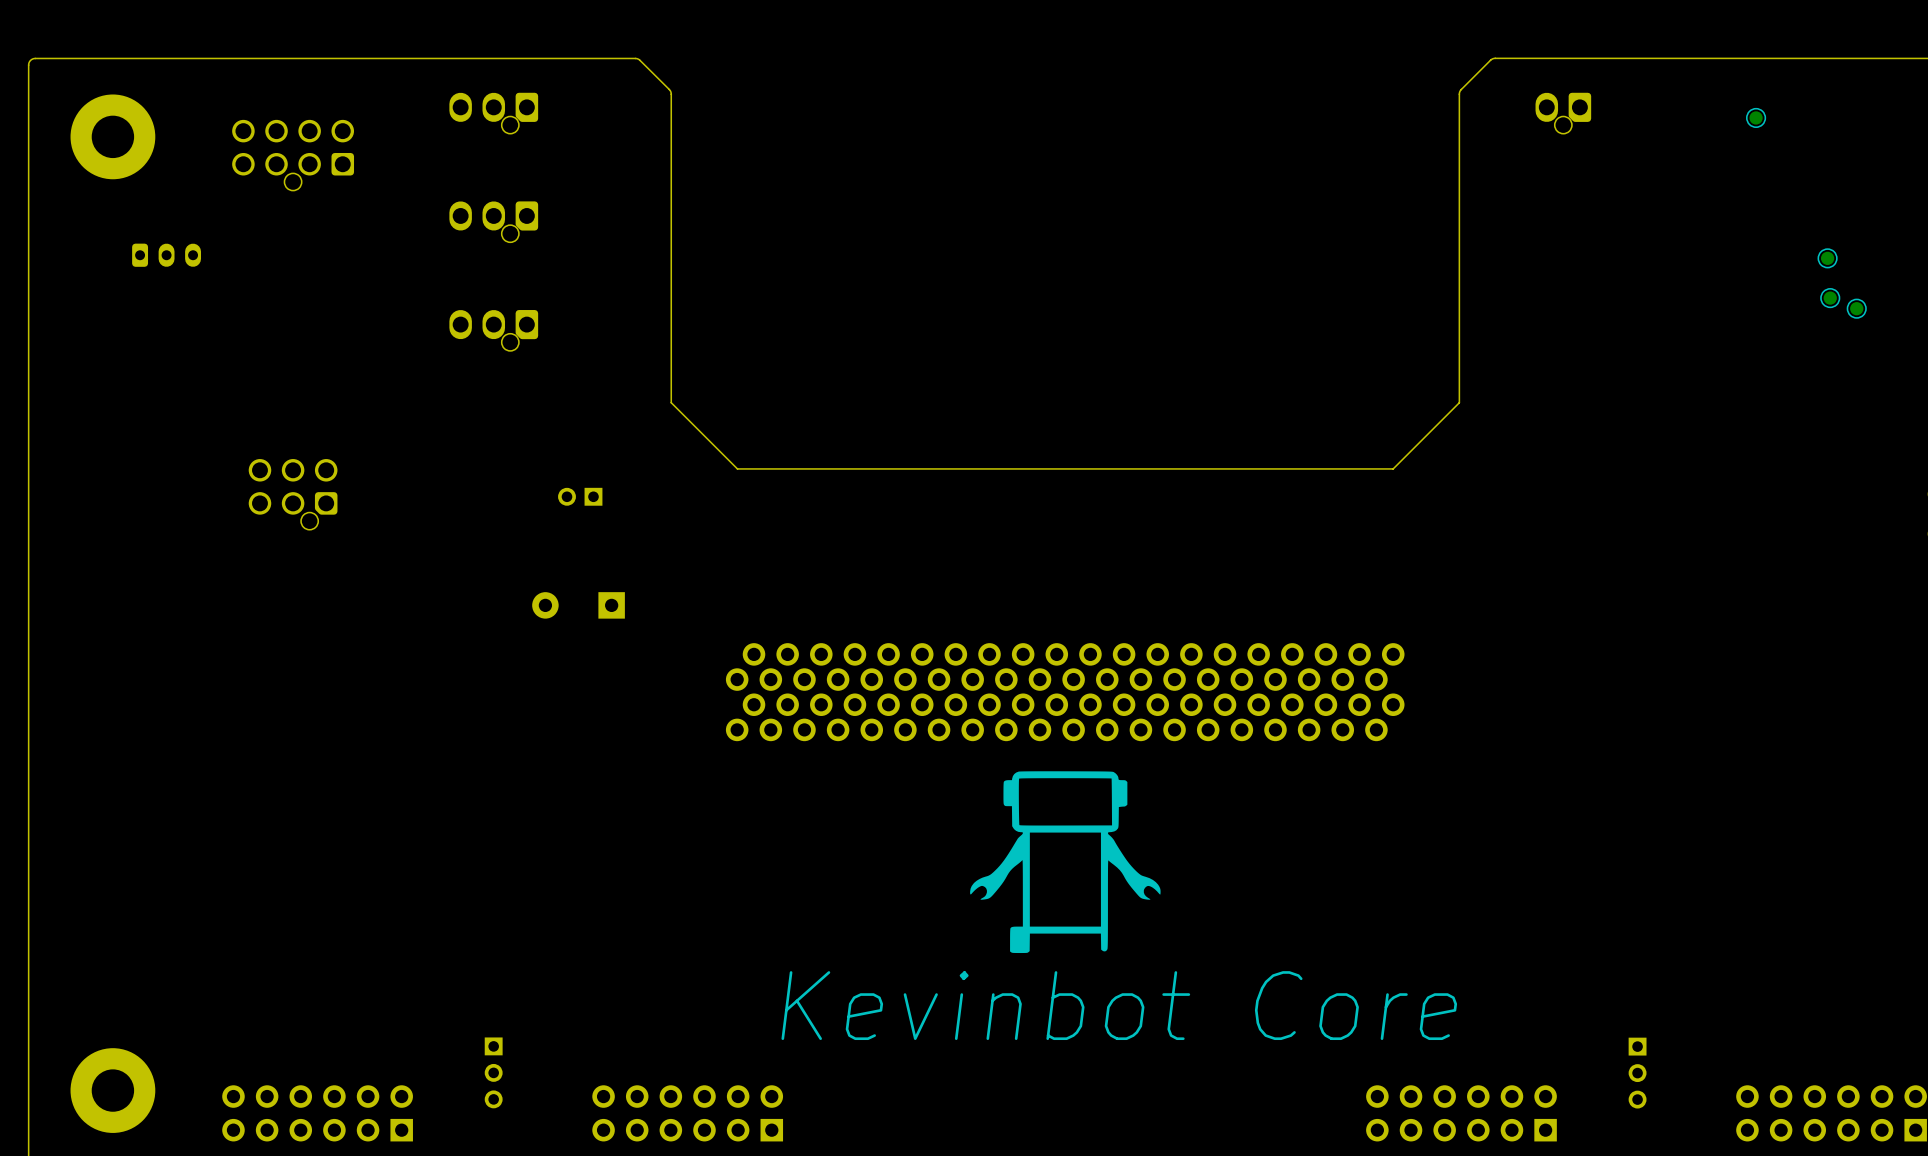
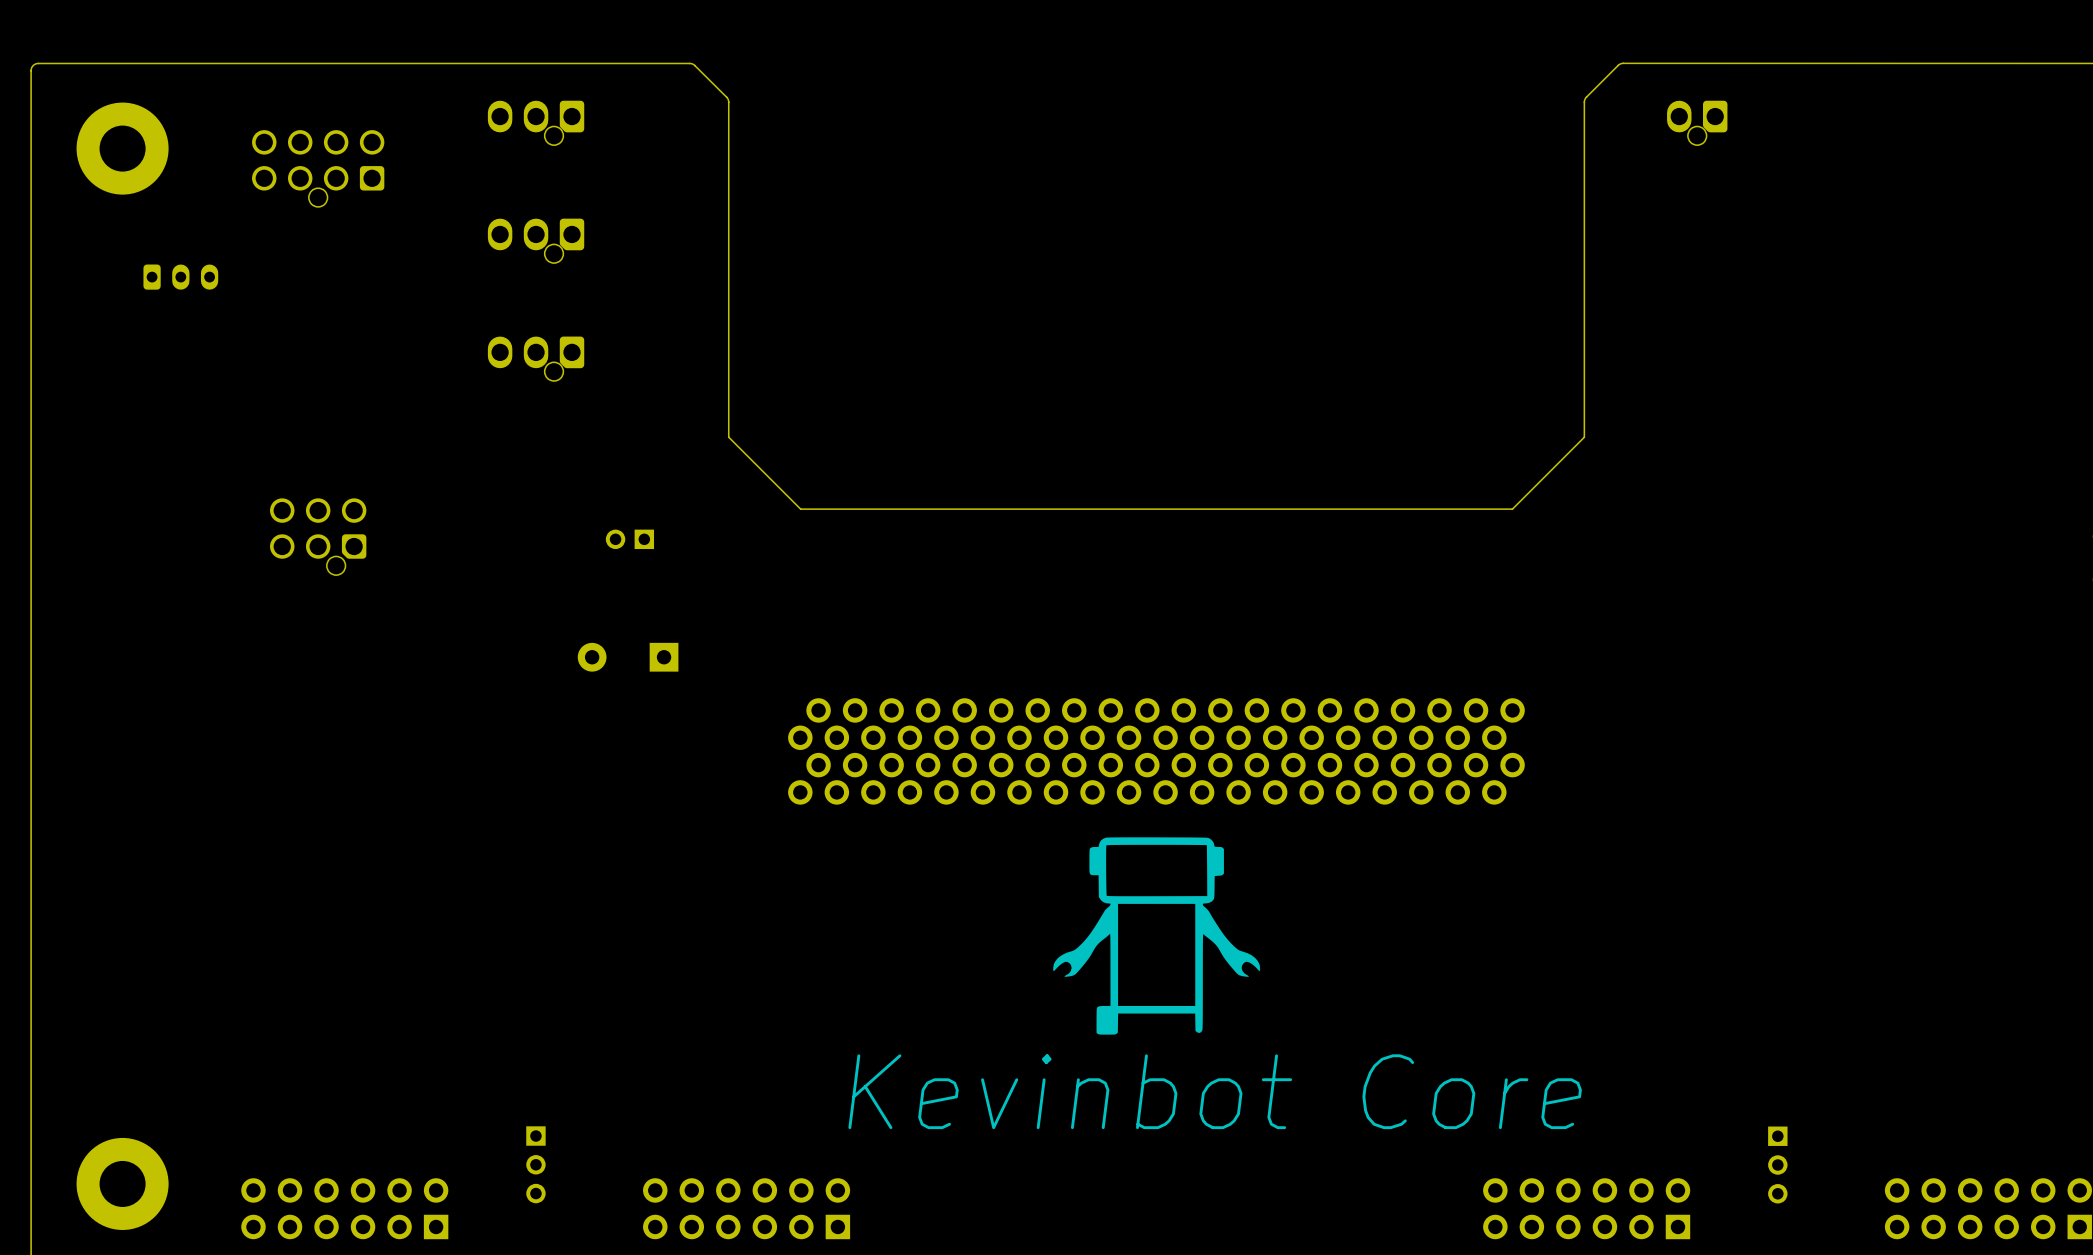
part: (1756, 117) -> none
part: (1827, 258) -> none
part: (1830, 298) -> none
part: (1856, 308) -> none

